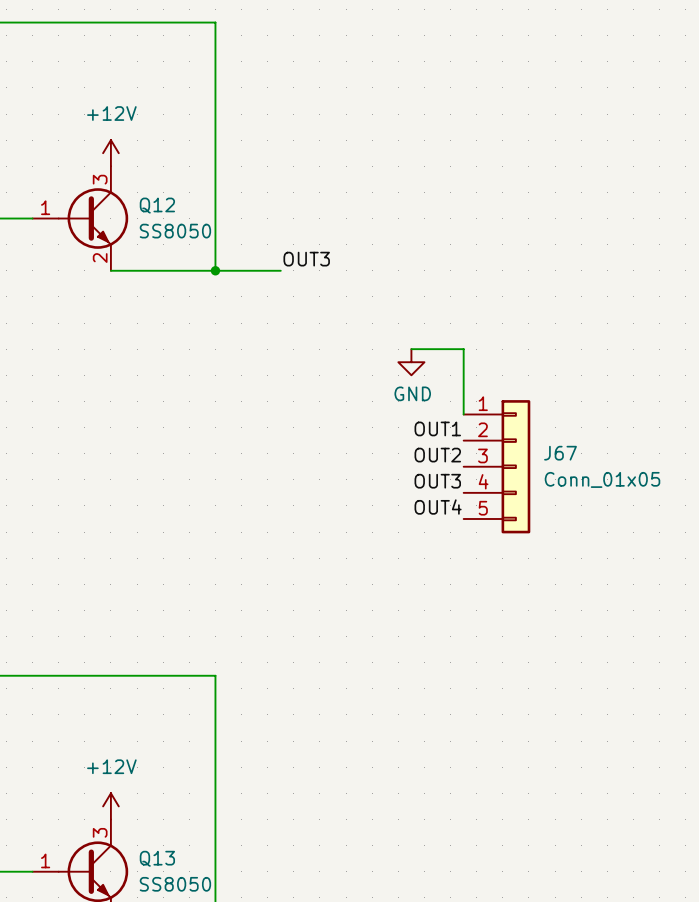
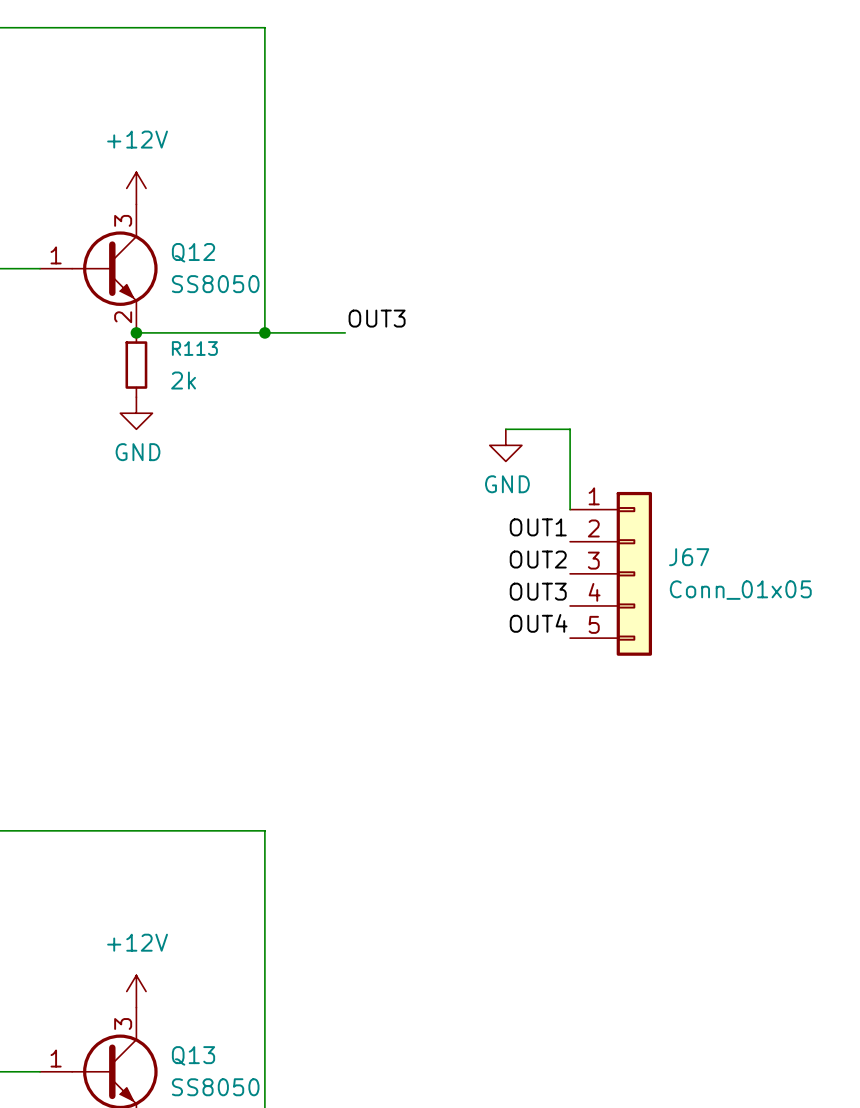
junction: none -> (136, 332)
R113: none -> 2k (136, 365)
power symbol: none -> GND (136, 413)

